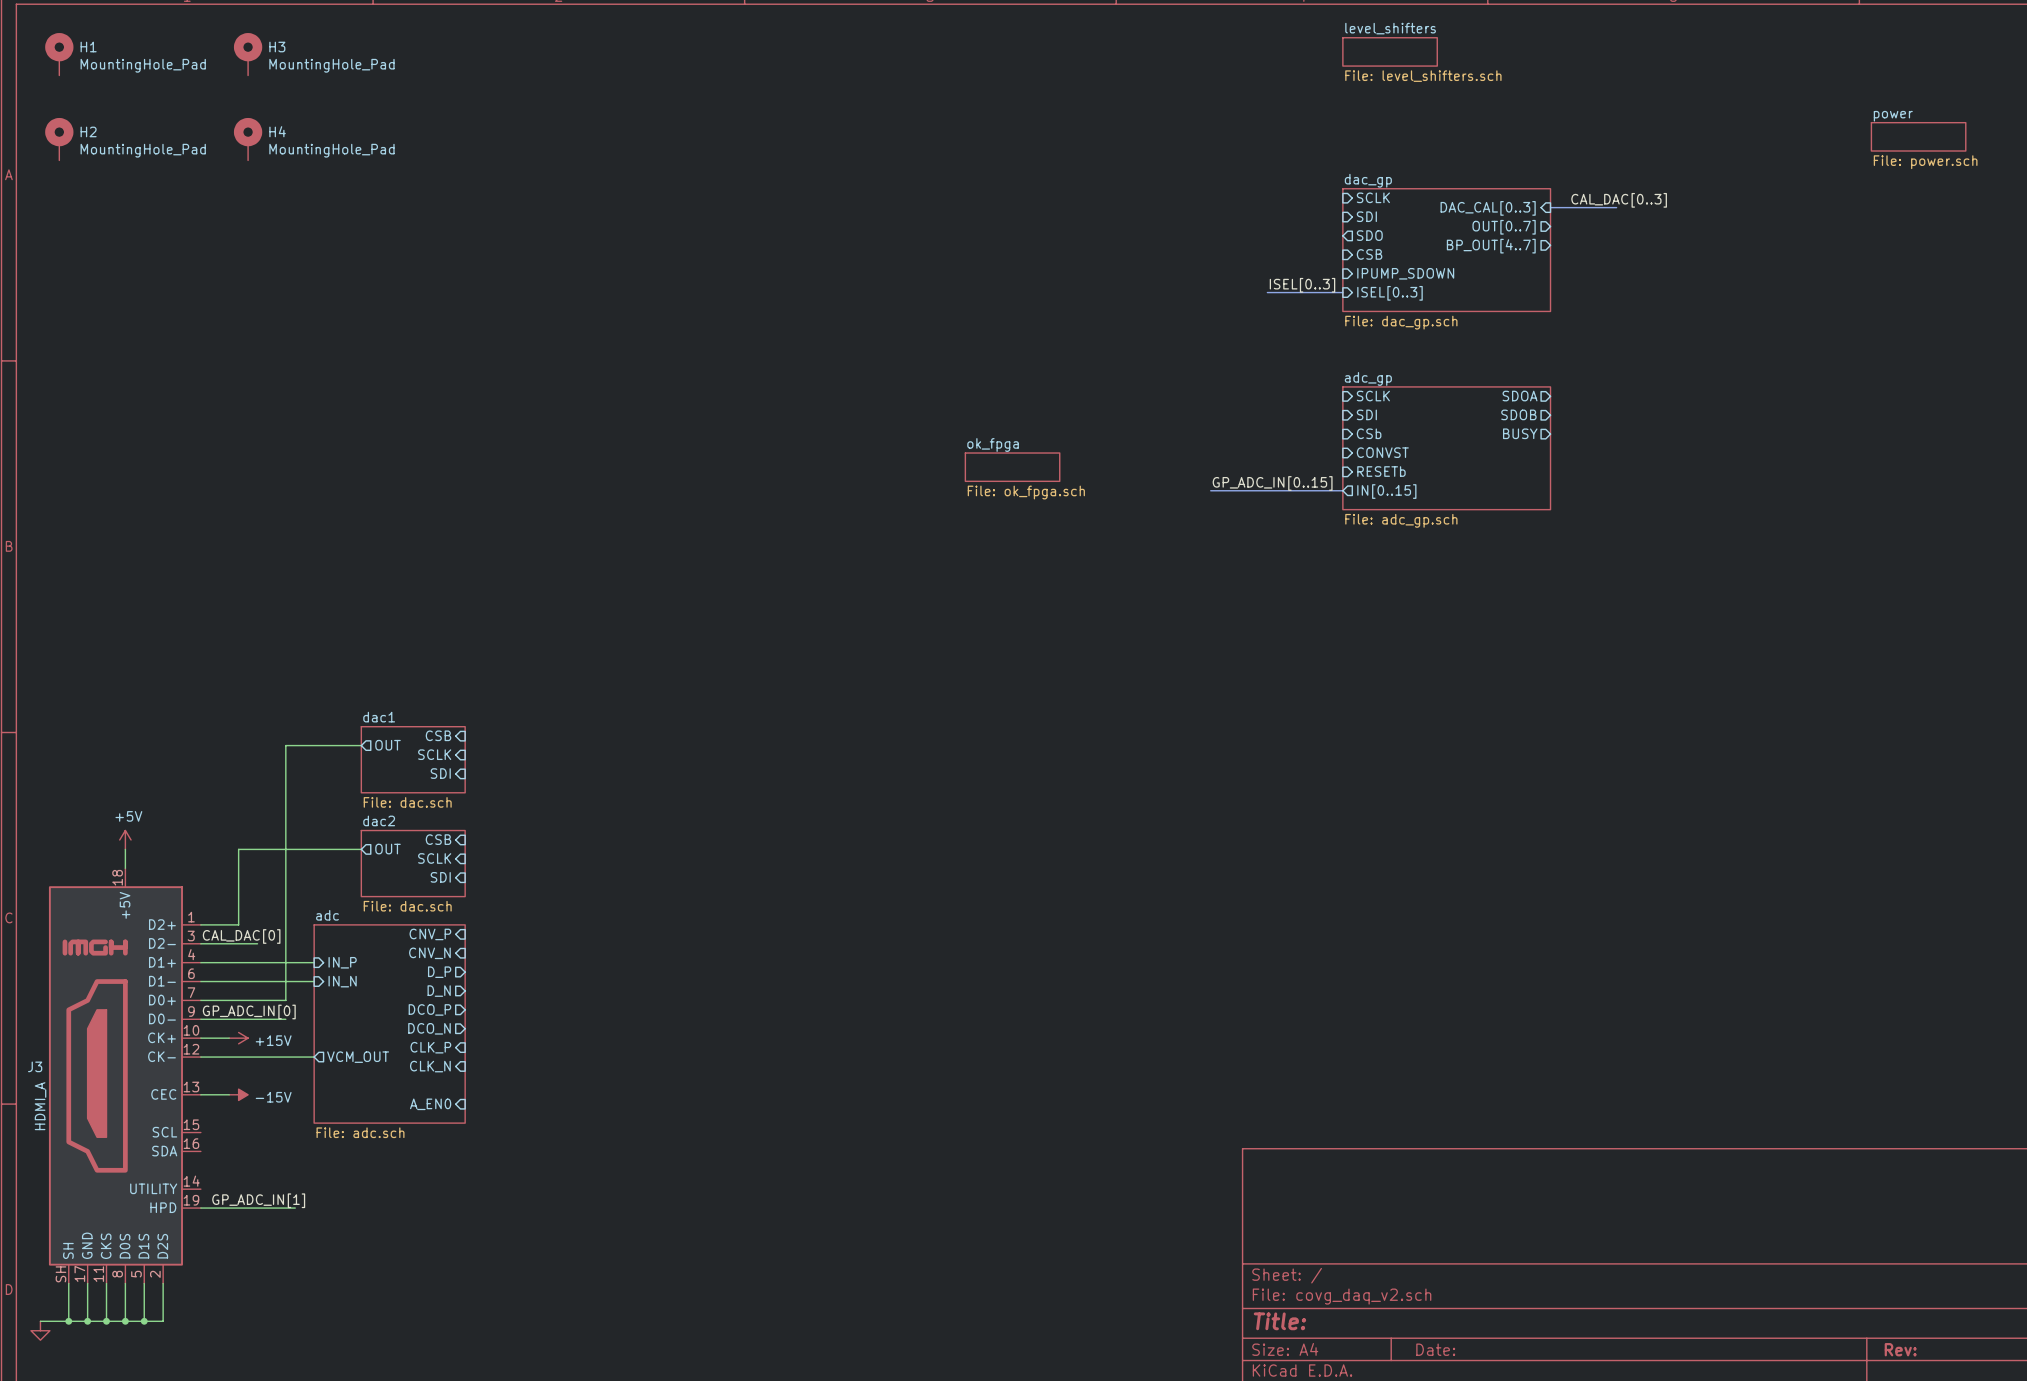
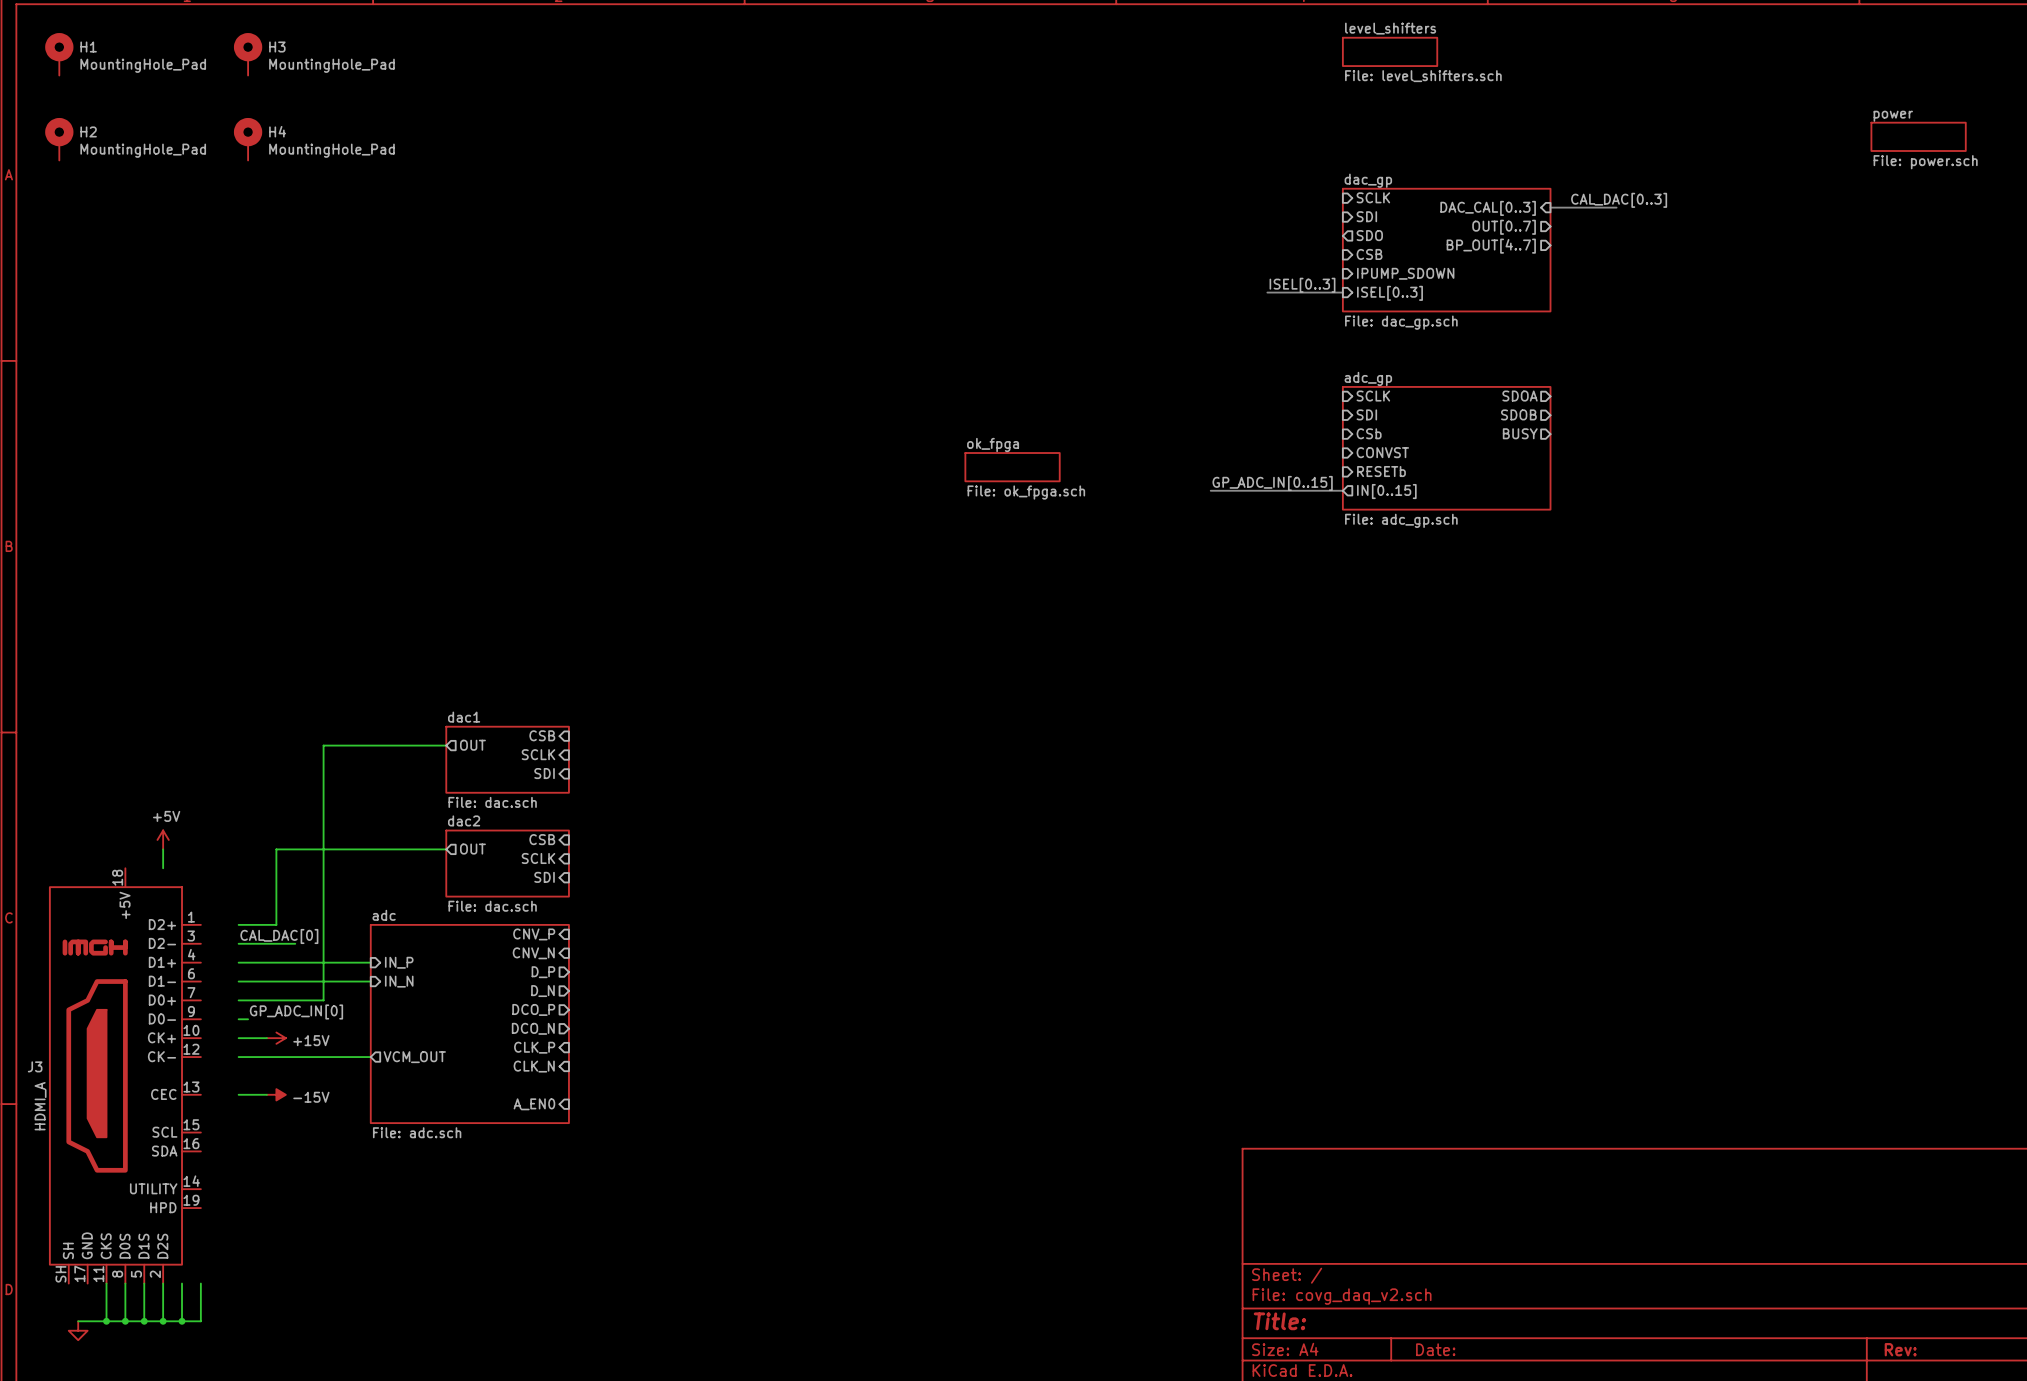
sheet dac1 shape: [361, 726, 466, 793] -> [446, 726, 569, 793]
sheet pin: CSB (438, 735) -> none
sheet pin: none -> CSB (542, 735)
wire: (323, 745) (285, 745) (285, 1000) -> (323, 745) (323, 1000) (285, 1000)
wire: none -> (361, 745) (446, 745)
sheet pin: OUT (387, 745) -> none
sheet pin: none -> OUT (472, 745)
sheet pin: SCLK (434, 754) -> none
sheet pin: none -> SCLK (538, 754)
sheet pin: SDI (440, 773) -> none
sheet pin: none -> SDI (544, 773)
sheet dac2 shape: [361, 830, 466, 897] -> [446, 830, 569, 897]
power symbol position: +5V (125, 839) -> +5V (163, 839)
sheet pin: CSB (438, 839) -> none
sheet pin: none -> CSB (542, 839)
wire: (125, 849) (125, 868) -> (163, 849) (163, 868)
wire: (276, 849) (238, 849) (238, 924) (200, 924) -> (276, 849) (276, 924) (238, 924)
wire: none -> (361, 849) (446, 849)
sheet pin: OUT (387, 849) -> none
sheet pin: none -> OUT (472, 849)
sheet pin: SCLK (434, 858) -> none
sheet pin: none -> SCLK (538, 858)
sheet pin: SDI (440, 877) -> none
sheet pin: none -> SDI (544, 877)
sheet pin position: CNV_P (430, 934) -> CNV_P (534, 934)
label position: CAL_DAC[0] (241, 936) -> CAL_DAC[0] (279, 936)
wire: (200, 943) (238, 943) -> (257, 943) (295, 943)
sheet pin position: CNV_N (429, 953) -> CNV_N (533, 953)
wire: (200, 962) (238, 962) -> none
wire: none -> (314, 962) (370, 962)
sheet pin position: IN_P (342, 962) -> IN_P (399, 962)
sheet pin position: D_P (439, 972) -> D_P (543, 972)
wire: (200, 981) (238, 981) -> none
wire: none -> (314, 981) (370, 981)
sheet pin position: IN_N (342, 981) -> IN_N (399, 981)
sheet pin position: D_N (439, 991) -> D_N (542, 991)
wire: (200, 1000) (238, 1000) -> none
sheet pin position: DCO_P (429, 1009) -> DCO_P (533, 1009)
label position: GP_ADC_IN[0] (249, 1011) -> GP_ADC_IN[0] (296, 1011)
wire: (200, 1019) (238, 1019) -> none
wire: (248, 1019) (285, 1019) -> none
sheet adc: File: adc.sch (389, 1024) -> none
sheet adc: none -> File: adc.sch (469, 1024)
sheet pin position: DCO_N (429, 1028) -> DCO_N (533, 1028)
wire: (200, 1038) (229, 1038) -> (238, 1038) (266, 1038)
power symbol position: +15V (238, 1038) -> +15V (276, 1038)
sheet pin position: CLK_P (430, 1047) -> CLK_P (534, 1047)
wire: (200, 1057) (238, 1057) -> none
wire: none -> (314, 1057) (370, 1057)
sheet pin position: VCM_OUT (358, 1057) -> VCM_OUT (414, 1057)
sheet pin position: CLK_N (430, 1066) -> CLK_N (534, 1066)
wire: (200, 1094) (229, 1094) -> (238, 1094) (266, 1094)
power symbol position: -15V (238, 1094) -> -15V (276, 1094)
sheet pin position: A_EN0 (430, 1104) -> A_EN0 (534, 1104)
label: GP_ADC_IN[1] (258, 1200) -> none
wire: (200, 1208) (295, 1208) -> none
wire: (68, 1283) (68, 1321) -> none
wire: (87, 1283) (87, 1321) -> (182, 1283) (182, 1321)
wire: none -> (200, 1283) (200, 1321) (163, 1321)
wire: (40, 1321) (78, 1321) -> none
junction: (68, 1321) -> none
junction: (87, 1321) -> none
junction: none -> (163, 1321)
junction: none -> (182, 1321)
power symbol position: (40, 1330) -> (78, 1330)

